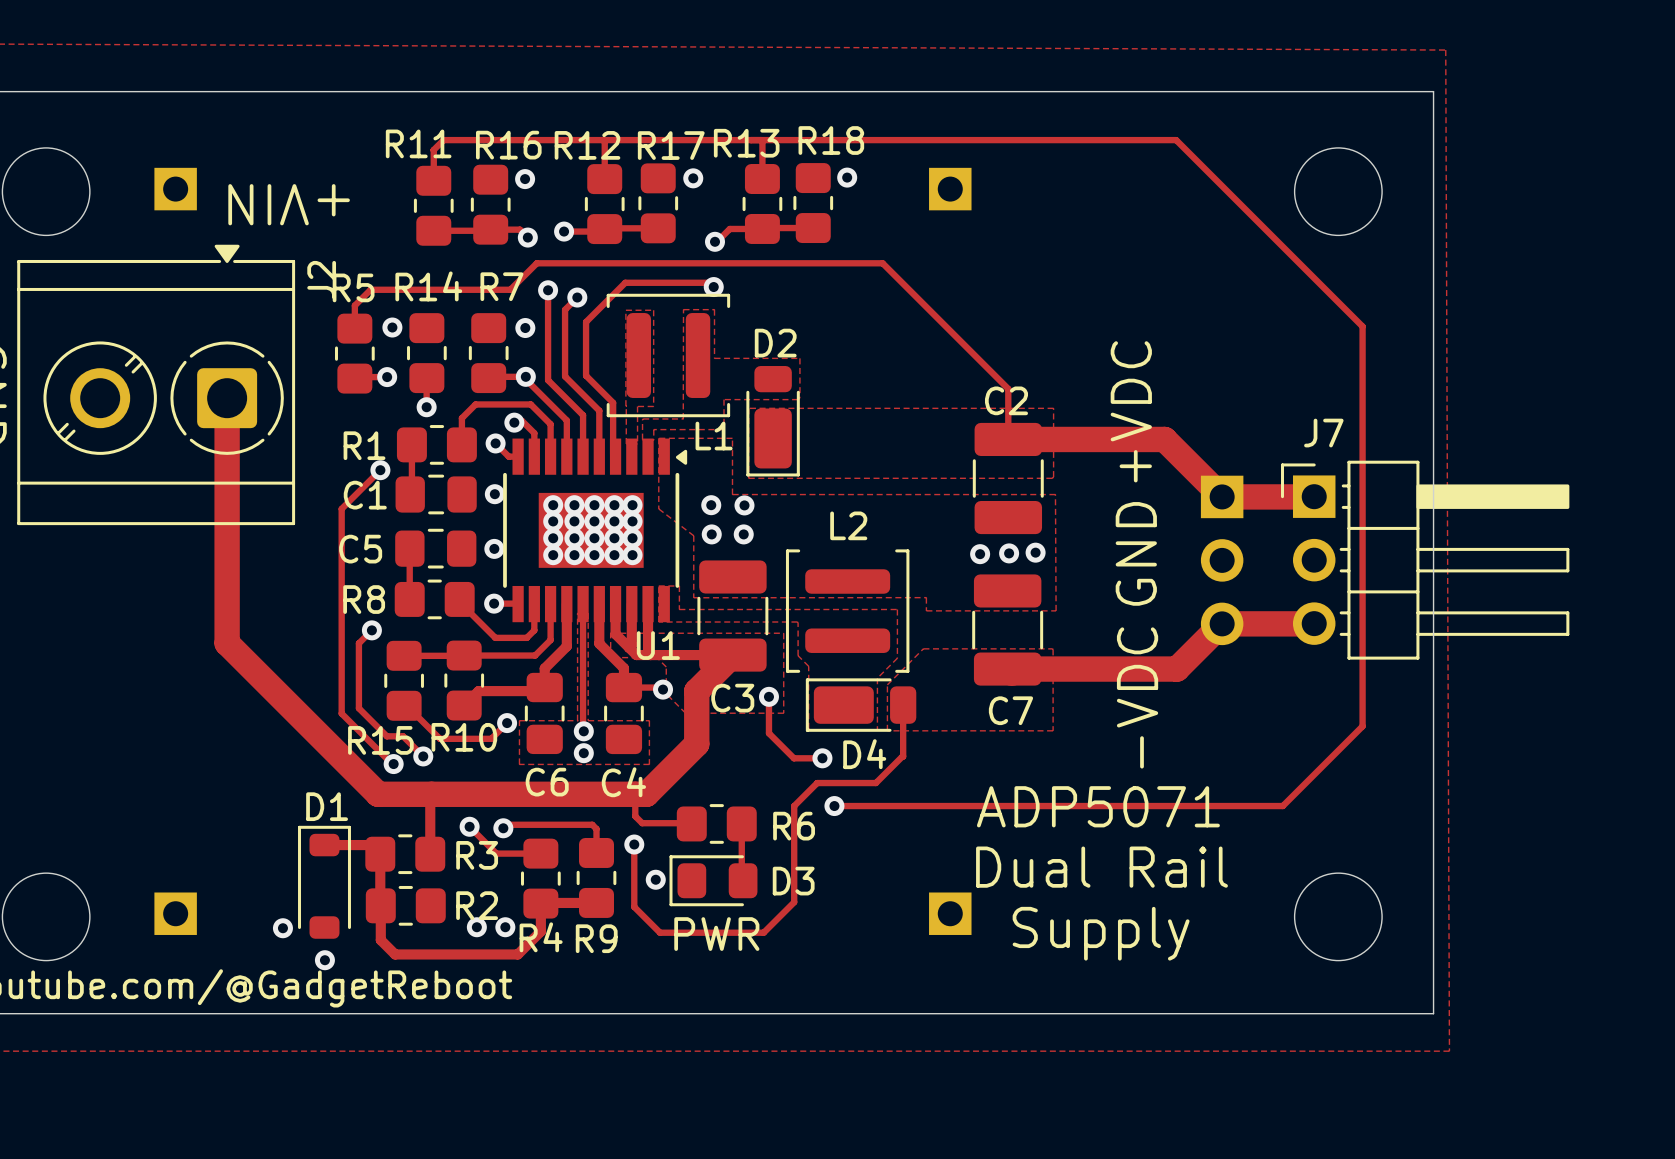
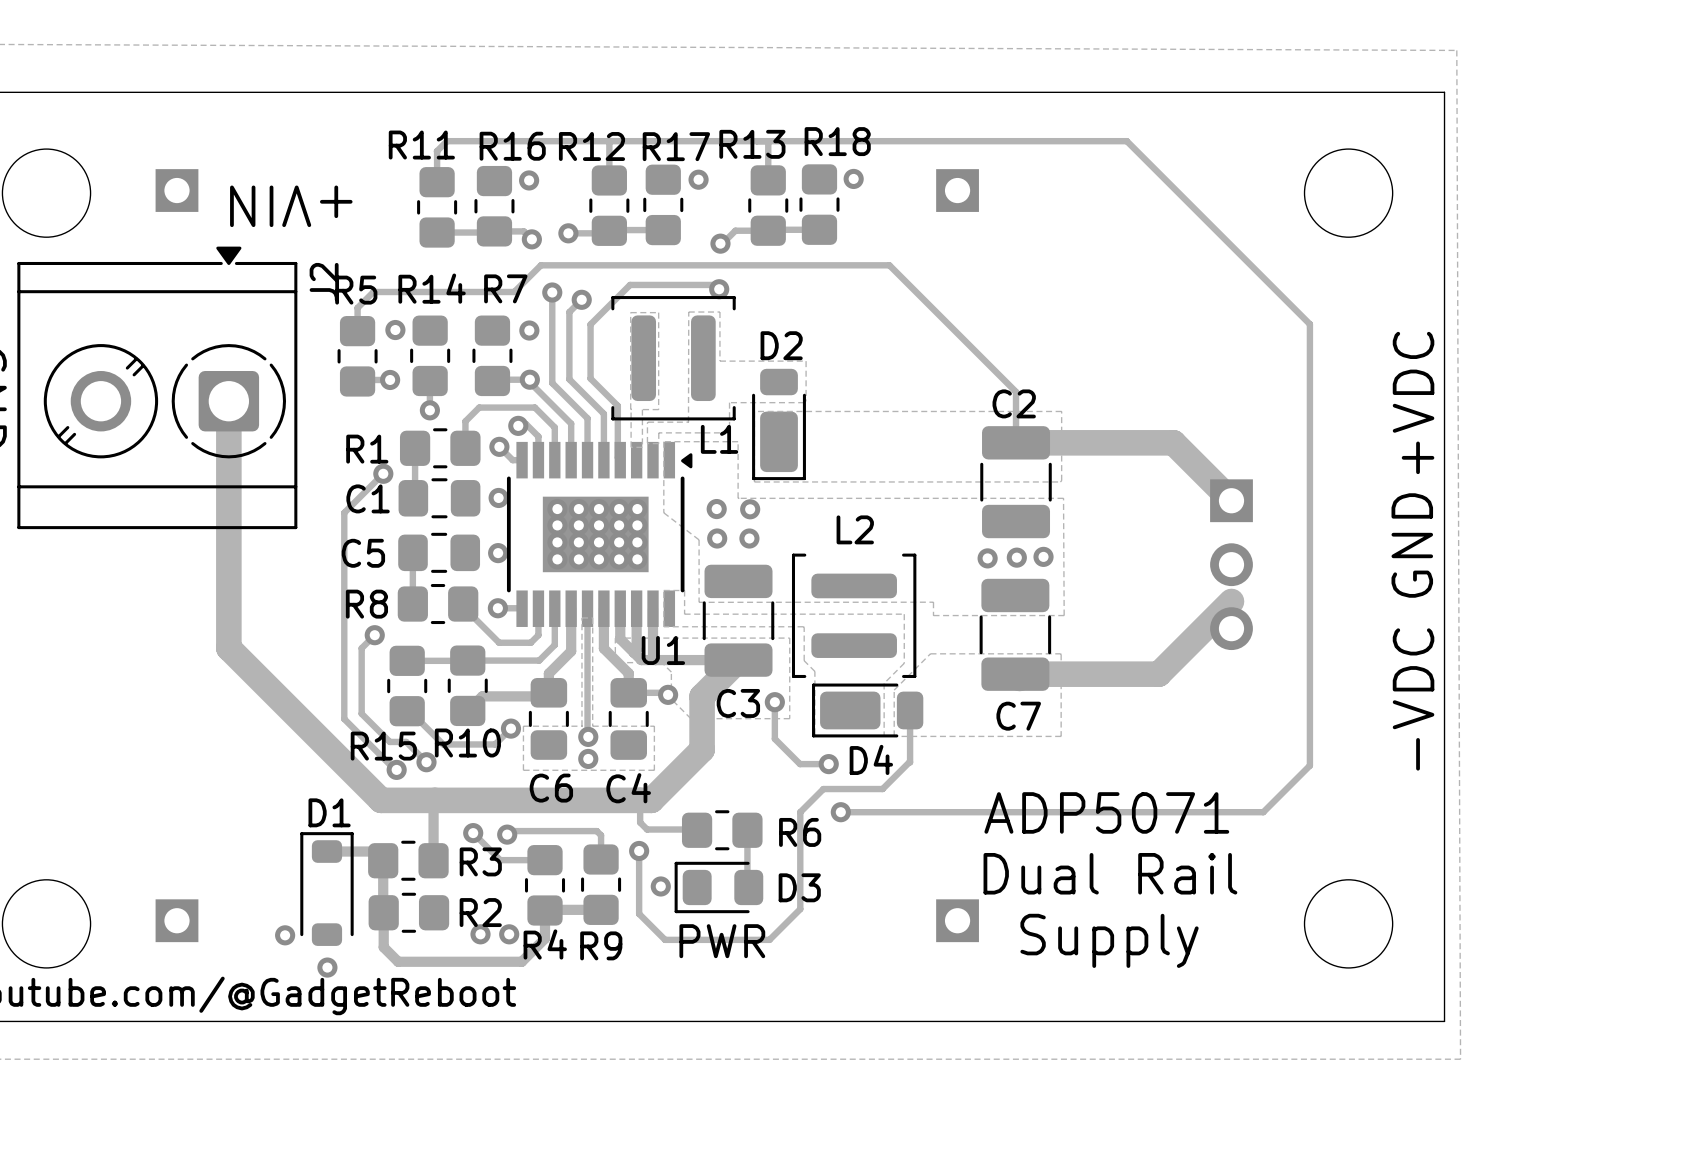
track: (1118, 140) (1176, 140) (1362, 326) (1362, 726) (1282, 806) (1253, 806) -> (1126, 141) (1309, 324) (1309, 765) (1263, 812)
text position: +VDC (1131, 411) -> +VDC (1413, 402)
track: (1222, 496) (1313, 496) -> none
text position: GND (1136, 553) -> GND (1412, 545)
J7: (1425, 560) -> none
track: (1313, 623) (1222, 623) (1176, 669) (1149, 669) -> (1231, 601) (1158, 674)
text position: -VDC (1137, 697) -> -VDC (1413, 699)

